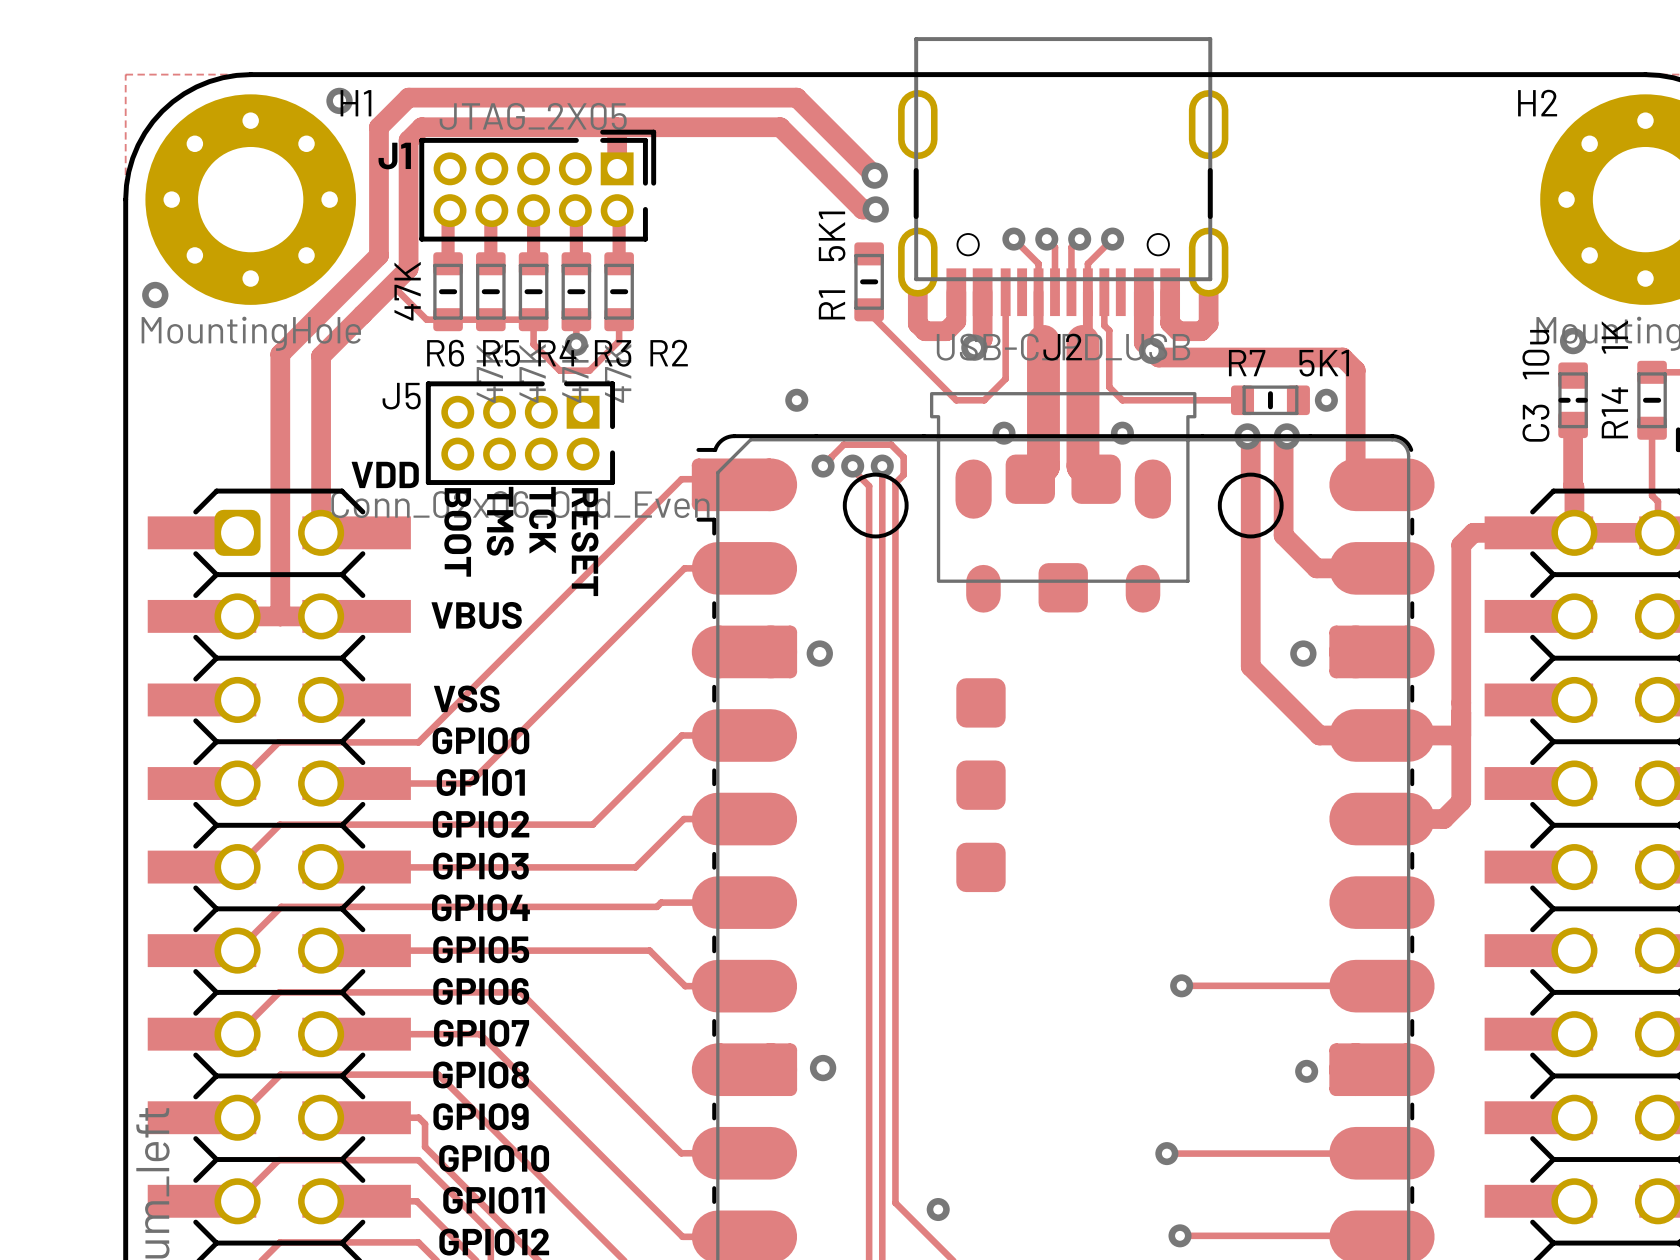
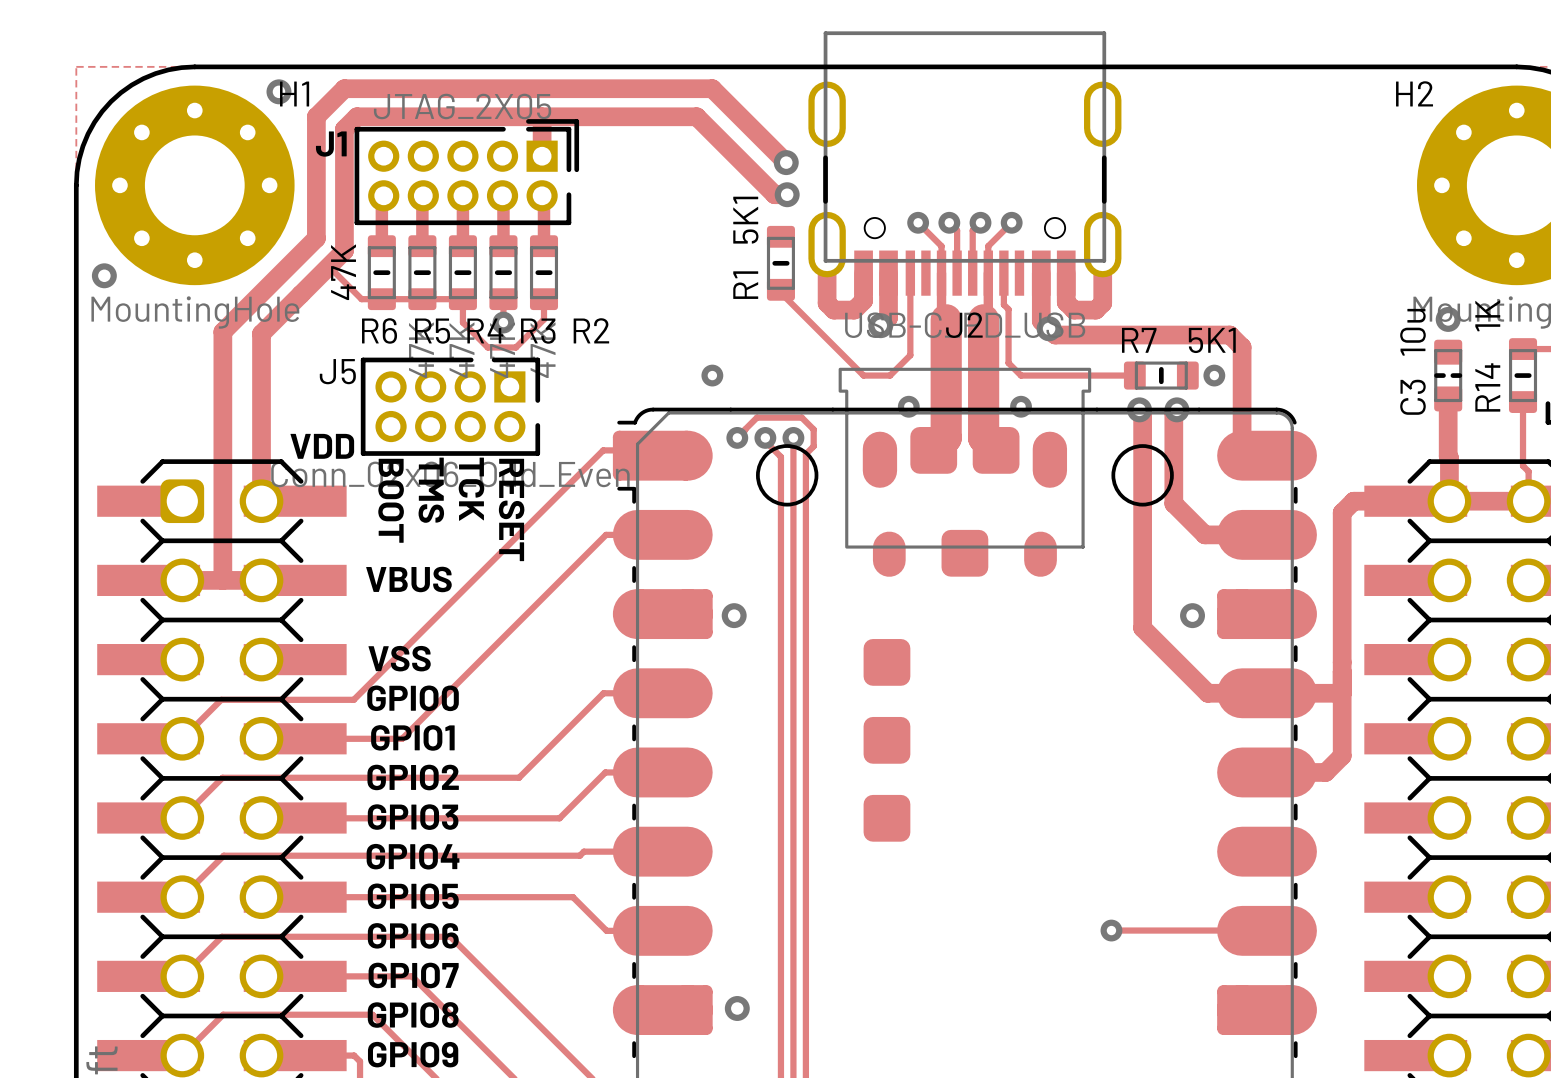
track: (1181, 985) (1217, 985) -> none
via position: (1181, 985) -> (1111, 930)
via: (1306, 1071) -> none

